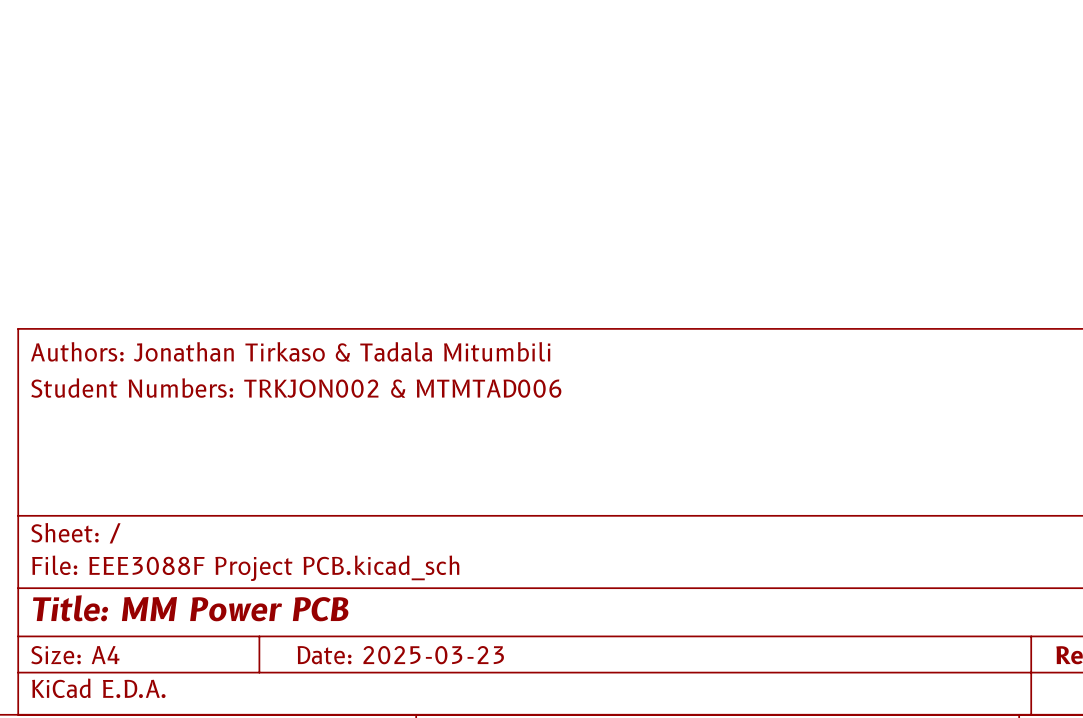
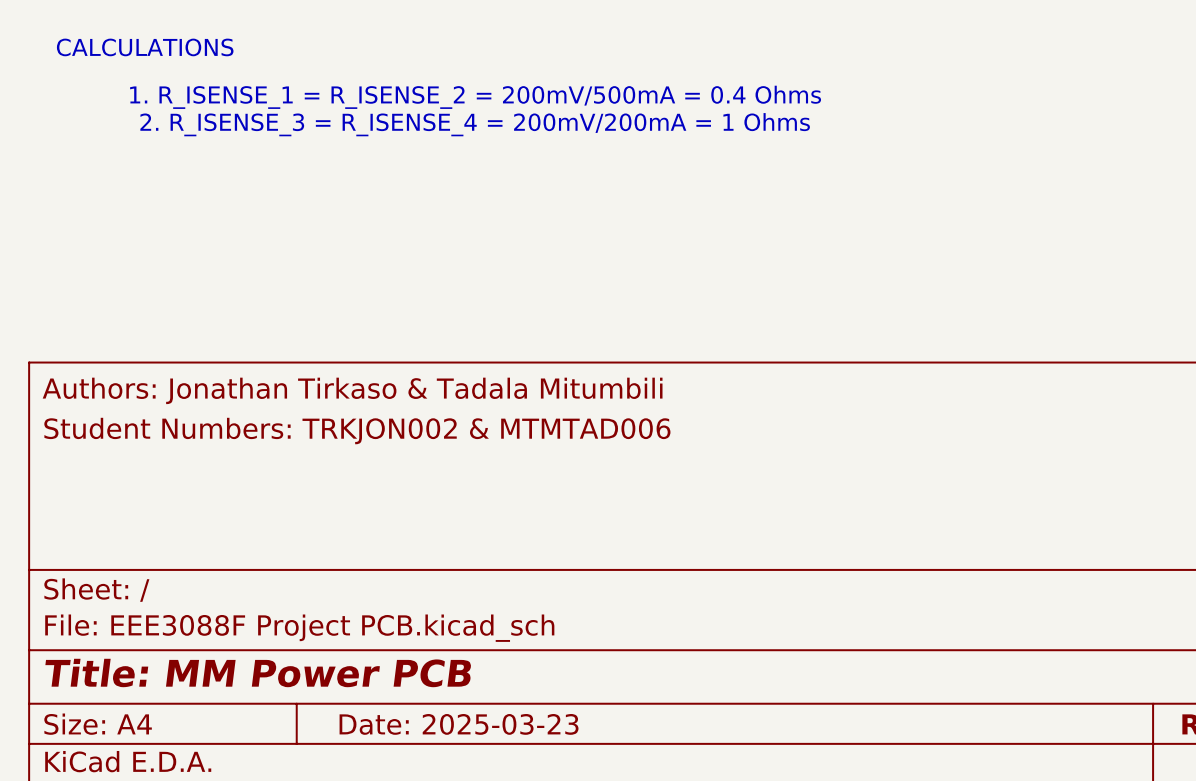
text: none -> CALCULATIONS (145, 47)
text: none -> 1. R_ISENSE_1 = R_ISENSE_2 = 200mV/500mA = 0.4 Ohms (475, 97)
text: none -> 2. R_ISENSE_3 = R_ISENSE_4 = 200mV/200mA = 1 Ohms (475, 124)

